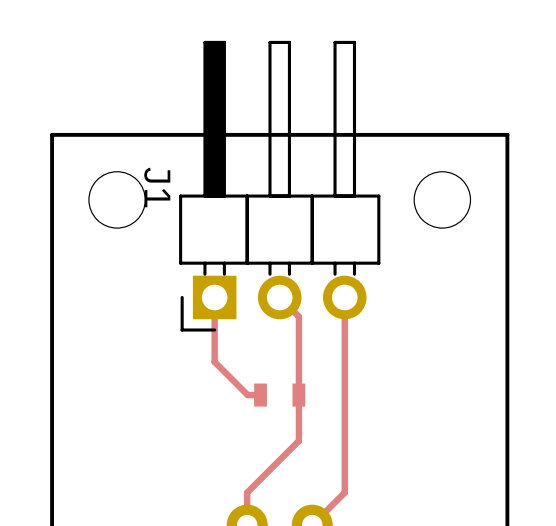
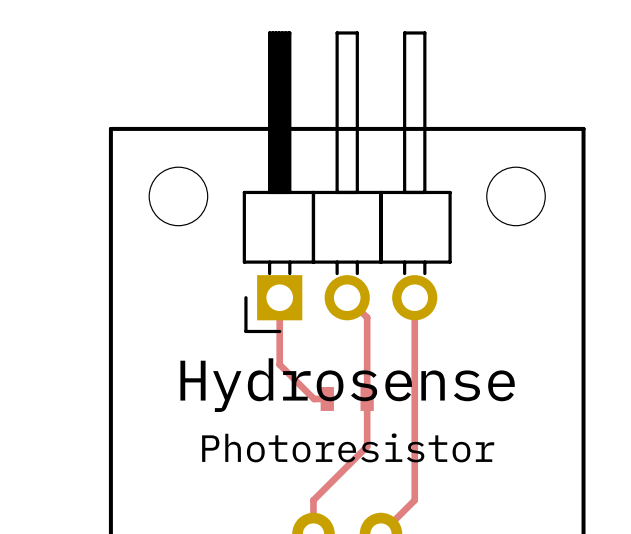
J1 name: J1 (157, 187) -> none
text: none -> Hydrosense (347, 385)
text: none -> Photoresistor (348, 447)

